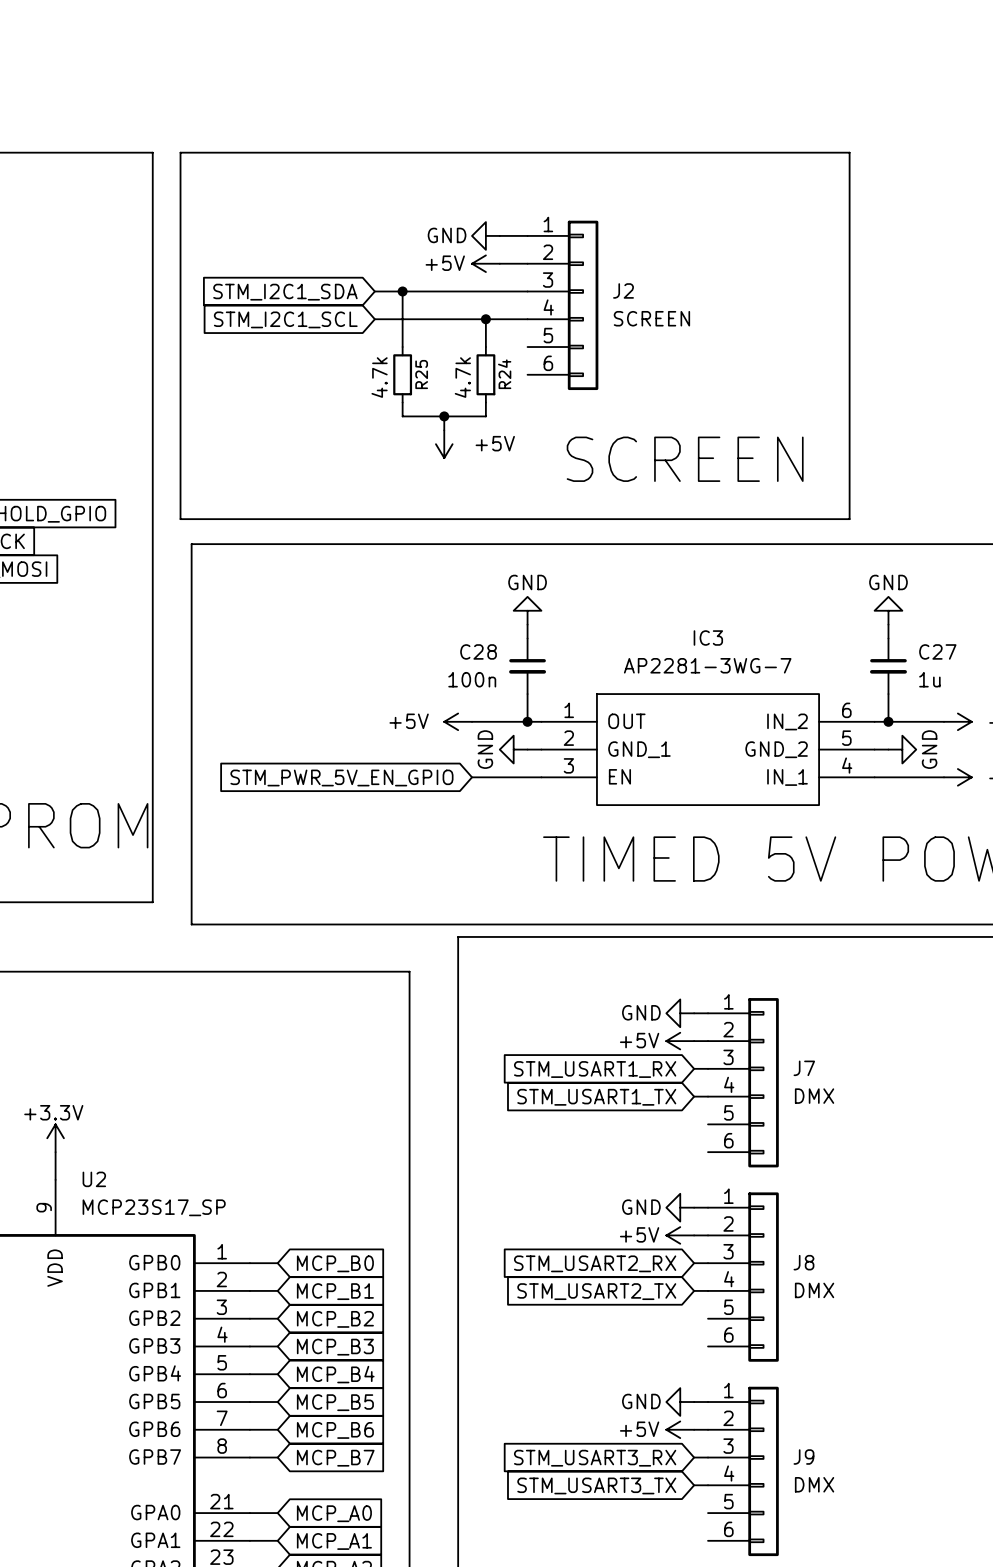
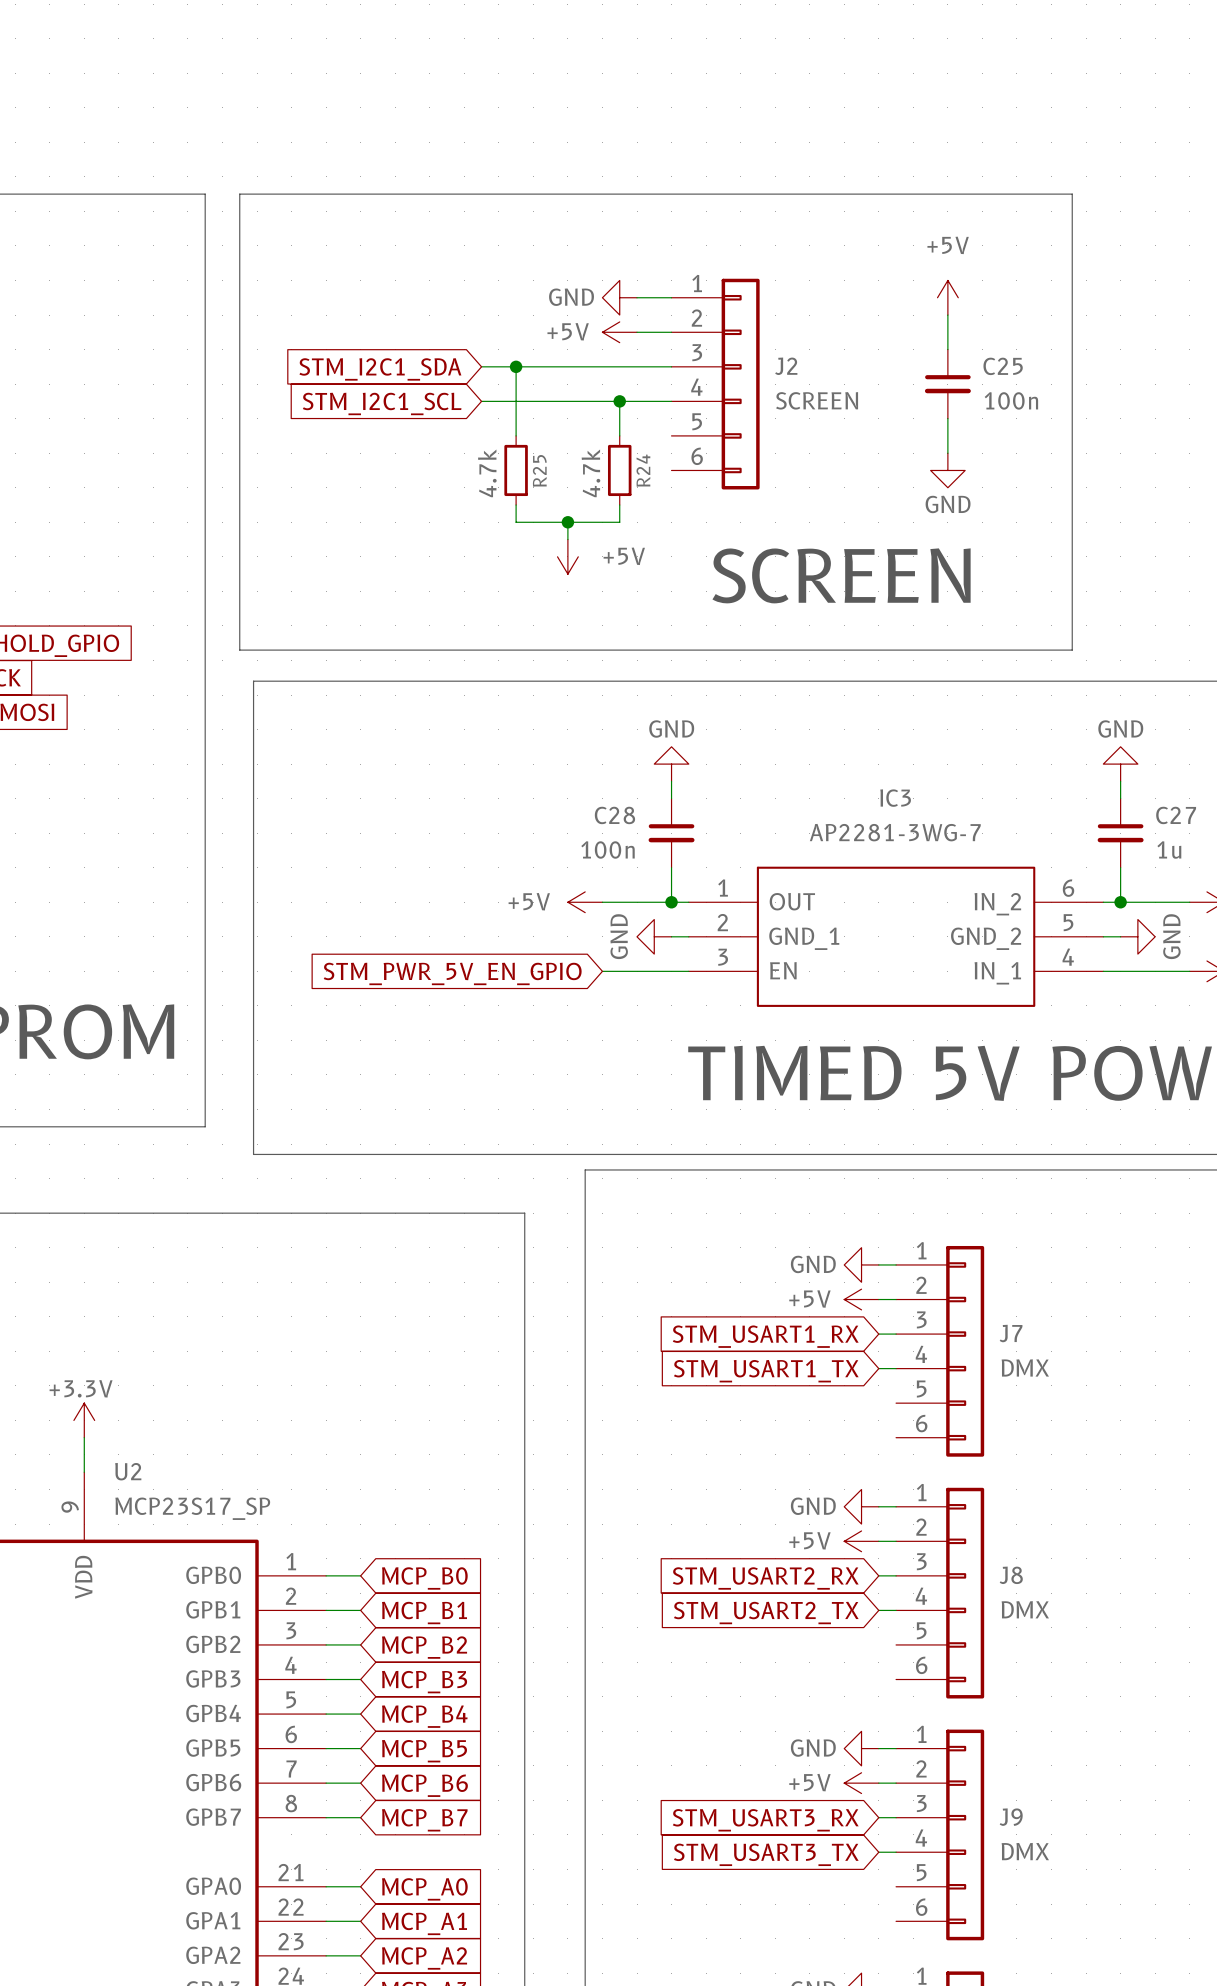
power symbol: none -> +5V (947, 297)
wire: none -> (947, 315) (947, 349)
C25: none -> 100n (947, 384)
wire: none -> (947, 418) (947, 453)
power symbol: none -> GND (947, 470)

